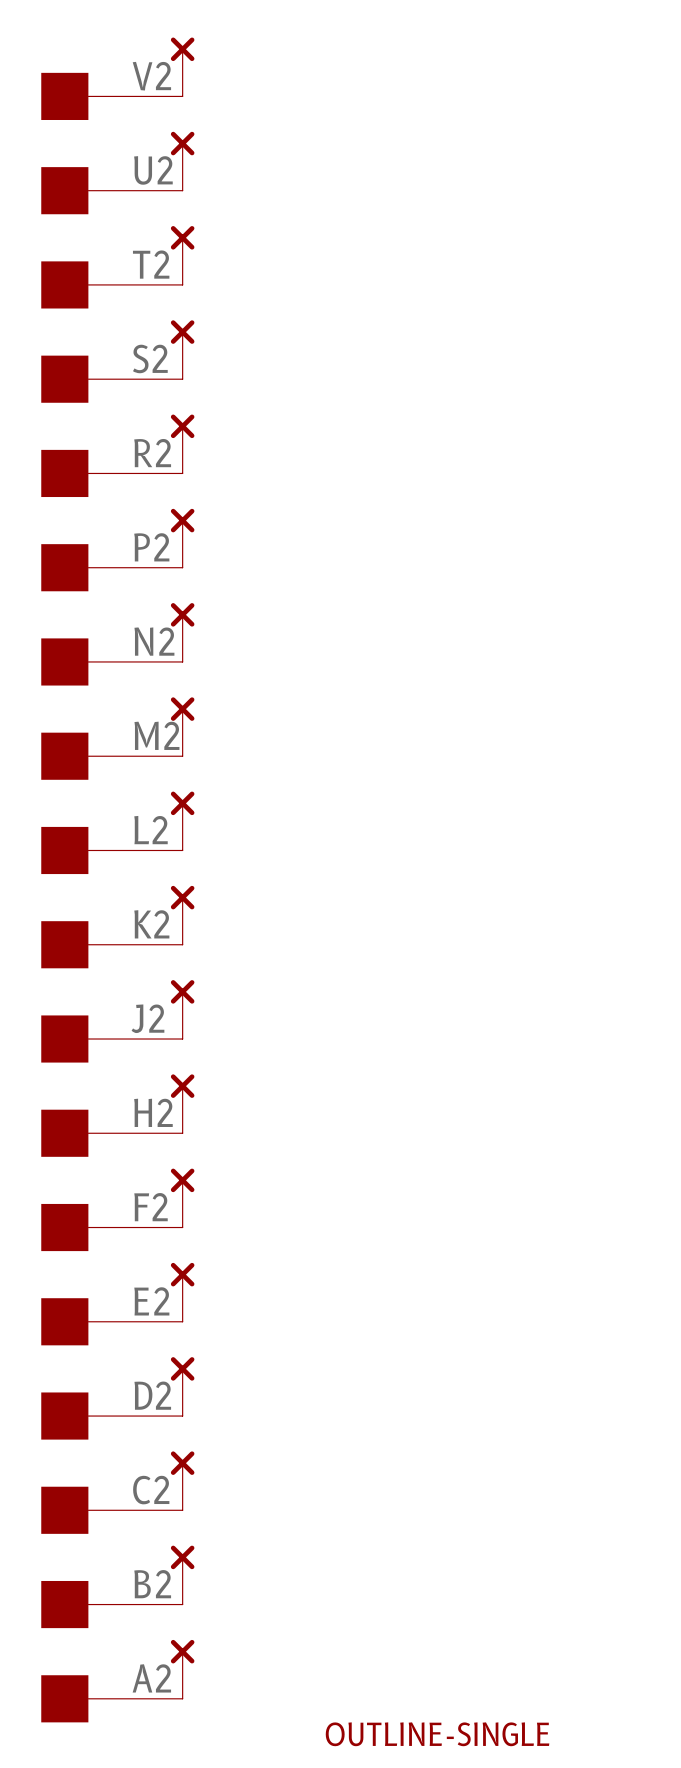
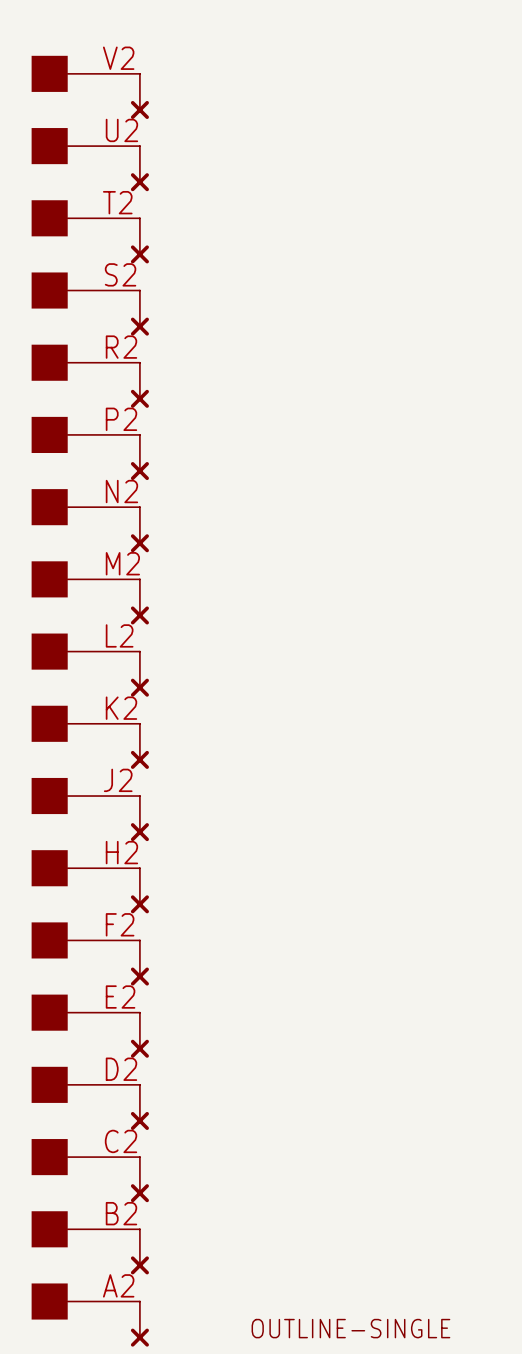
part: (182, 66) -> none
part: none -> (139, 96)
part: (182, 161) -> none
part: none -> (139, 168)
part: (182, 255) -> none
part: none -> (139, 240)
part: (182, 349) -> none
part: none -> (139, 313)
part: (182, 444) -> none
part: none -> (139, 385)
part: (182, 538) -> none
part: none -> (139, 457)
part: (182, 632) -> none
part: none -> (139, 529)
part: (182, 726) -> none
part: none -> (139, 601)
part: (182, 821) -> none
part: none -> (139, 674)
part: (182, 915) -> none
part: none -> (139, 746)
part: (182, 1009) -> none
part: none -> (139, 818)
part: (182, 1103) -> none
part: none -> (139, 890)
part: (182, 1198) -> none
part: none -> (139, 963)
part: (182, 1292) -> none
part: none -> (139, 1035)
part: (182, 1386) -> none
part: none -> (139, 1107)
part: (182, 1480) -> none
part: none -> (139, 1179)
part: (182, 1575) -> none
part: none -> (139, 1251)
part: (182, 1669) -> none
part: none -> (139, 1324)

